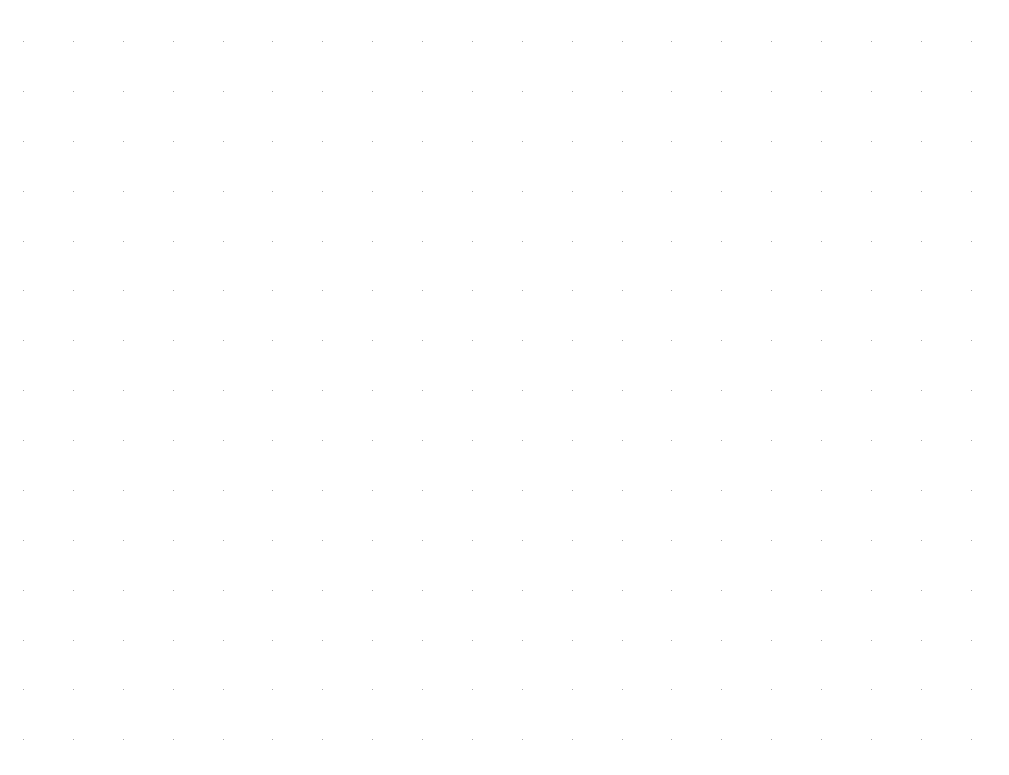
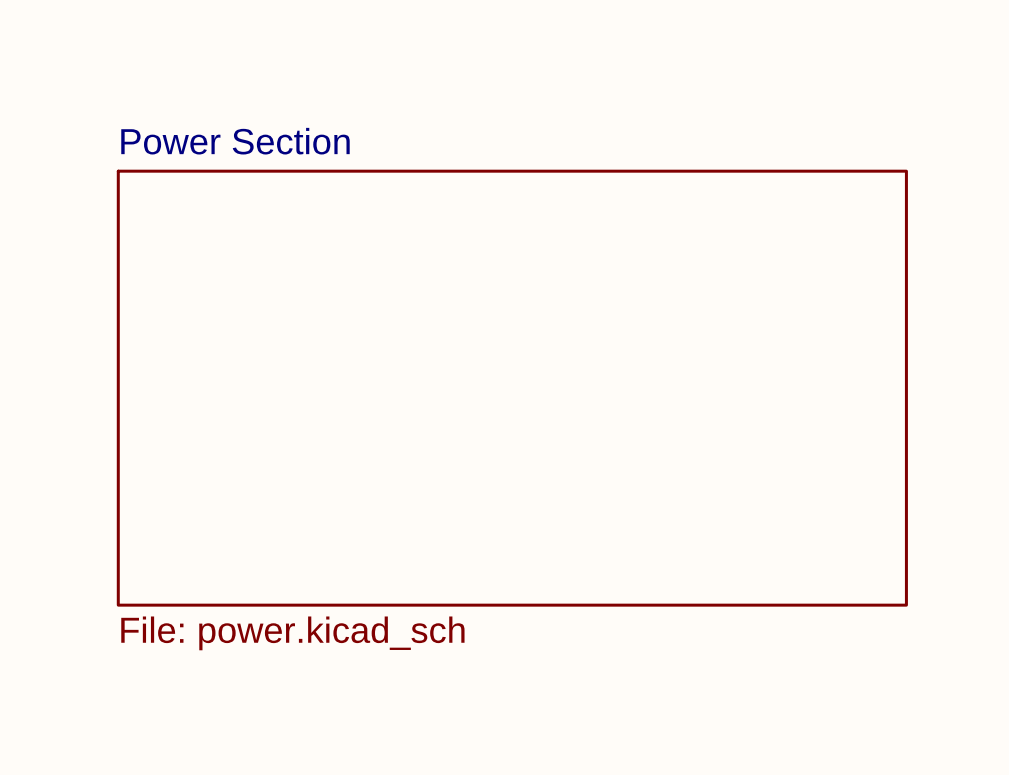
sheet Power Section: none -> File: power.kicad_sch (512, 388)

